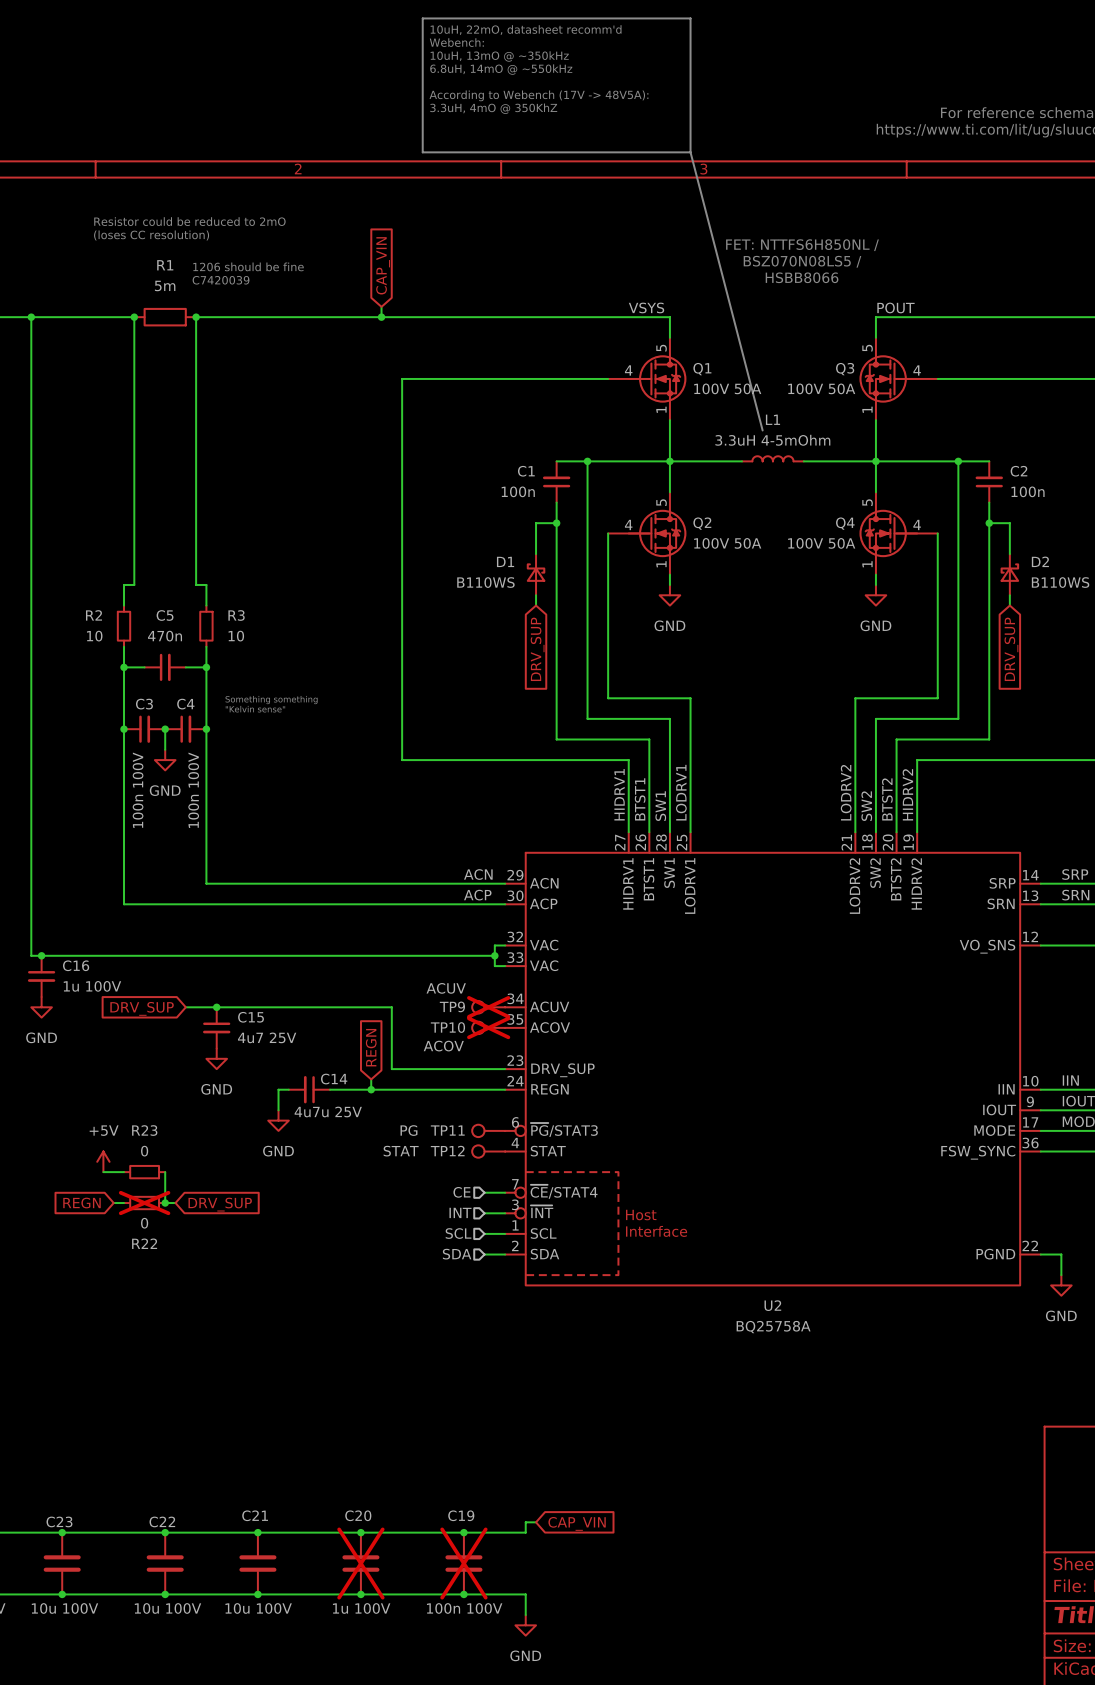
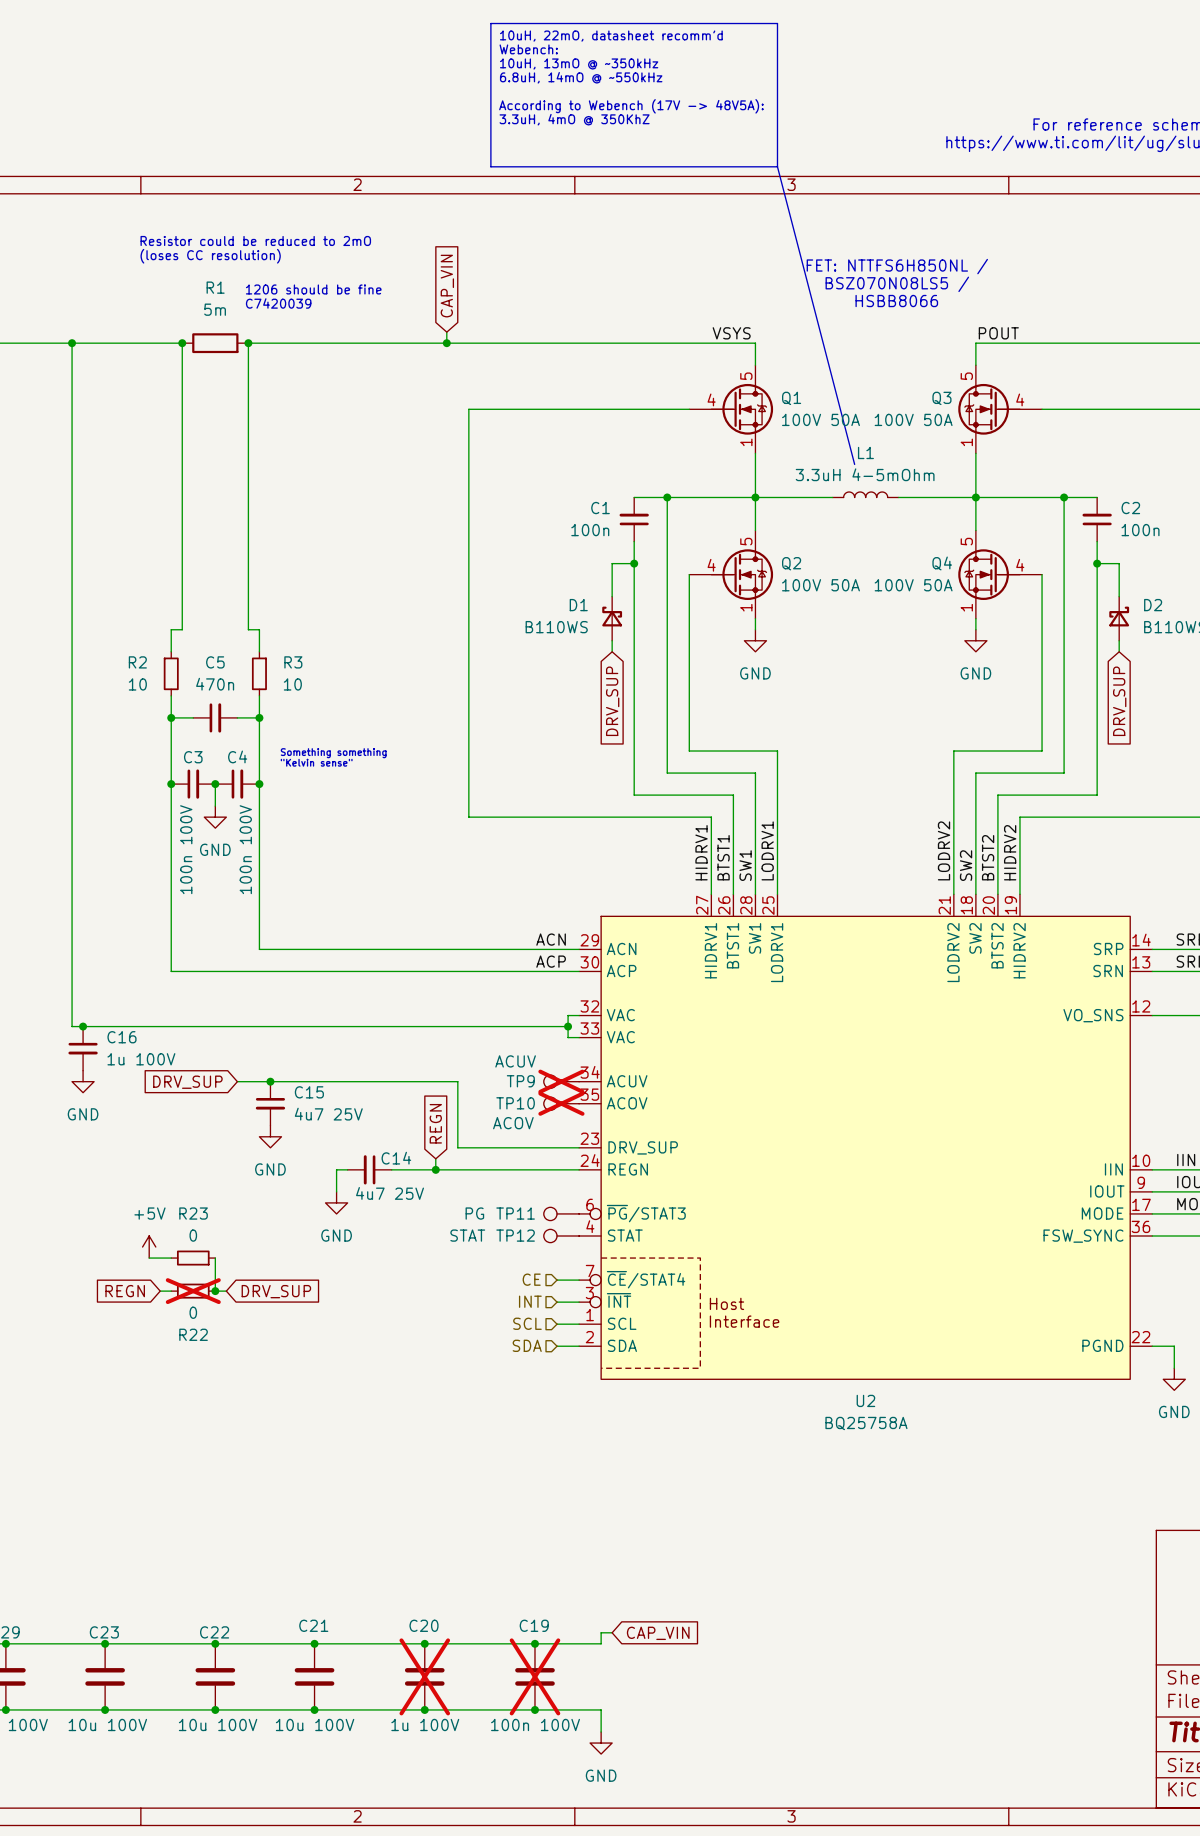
C14 value: 4u7u 25V (328, 1111) -> 4u7 25V (390, 1193)

